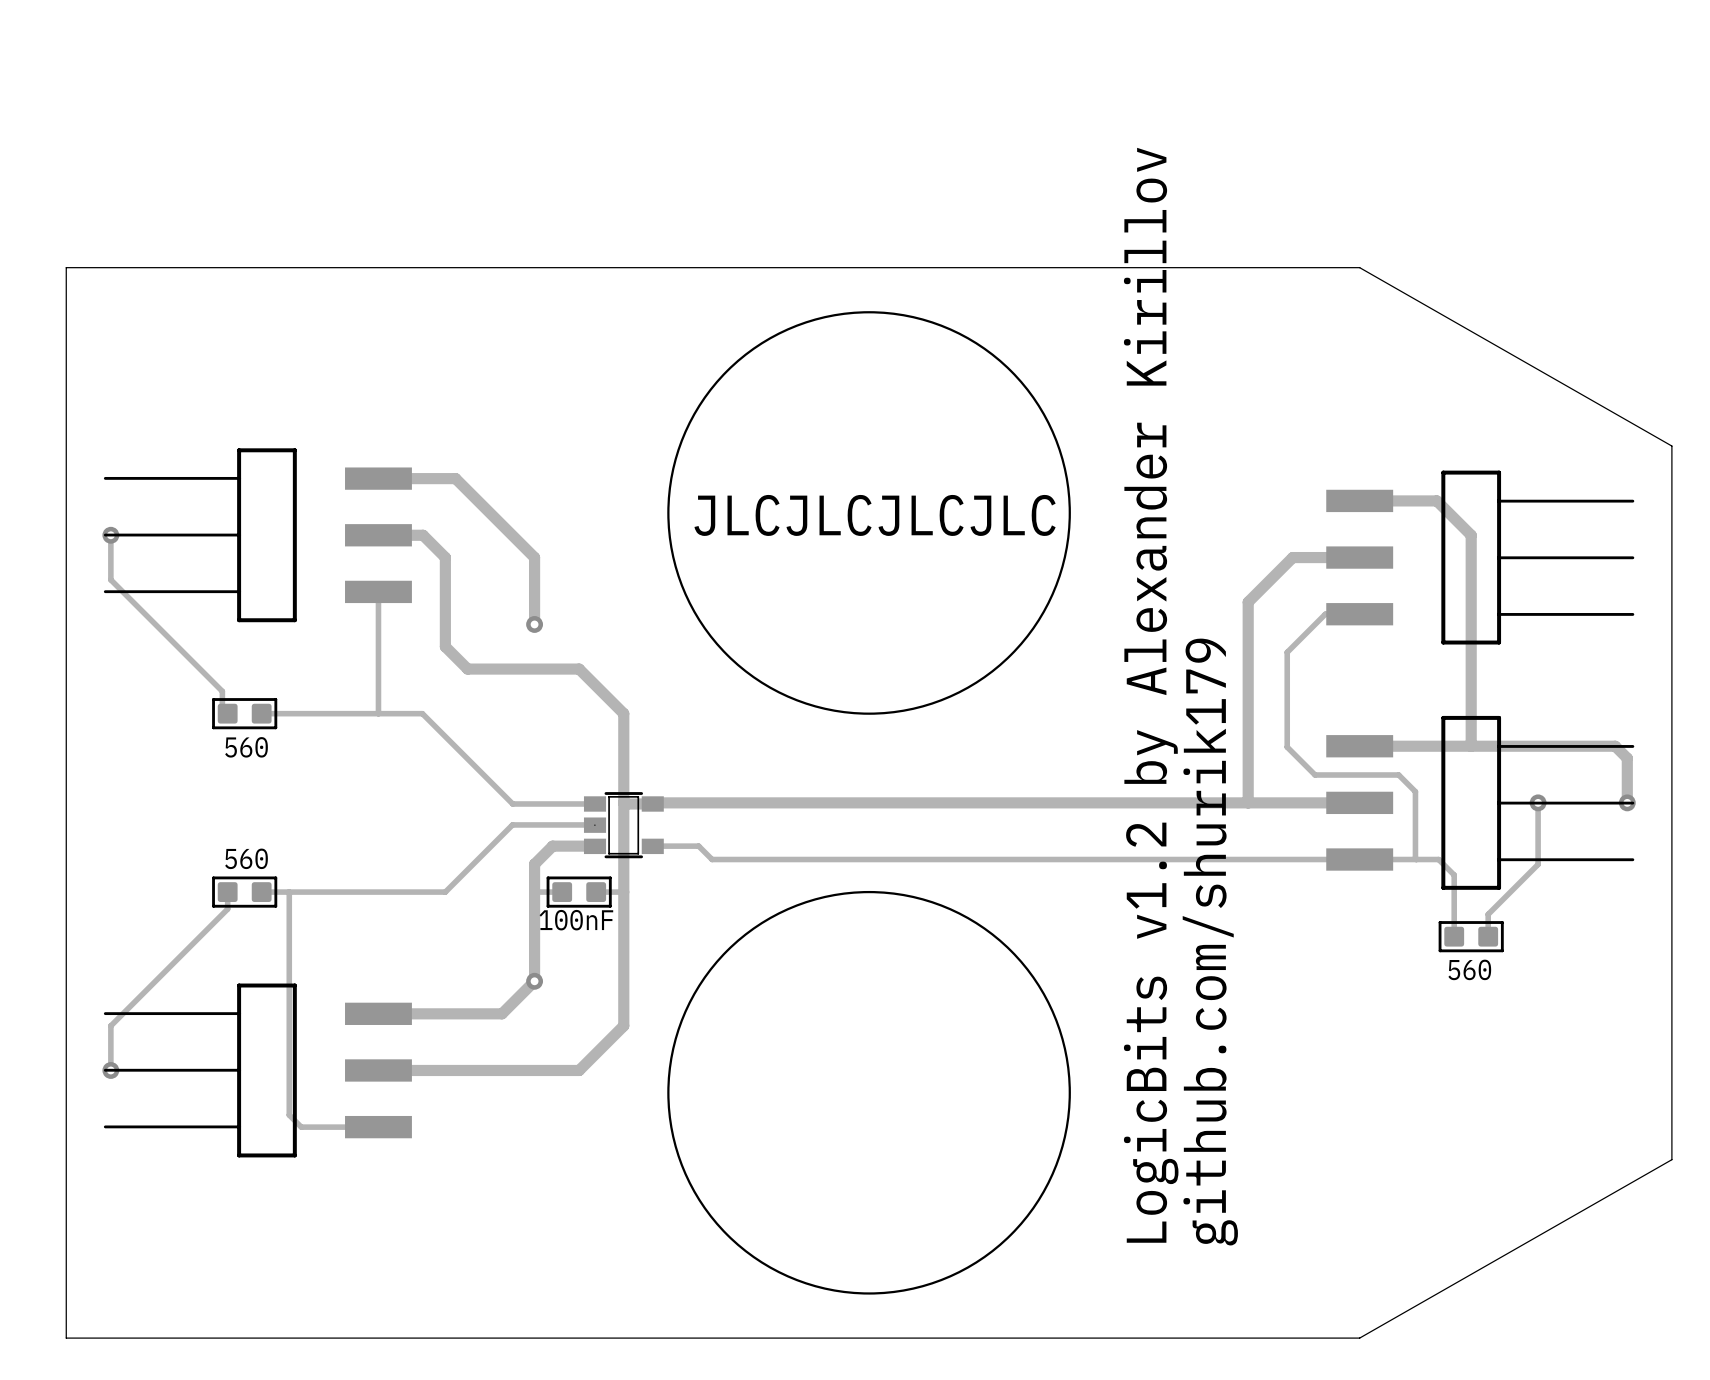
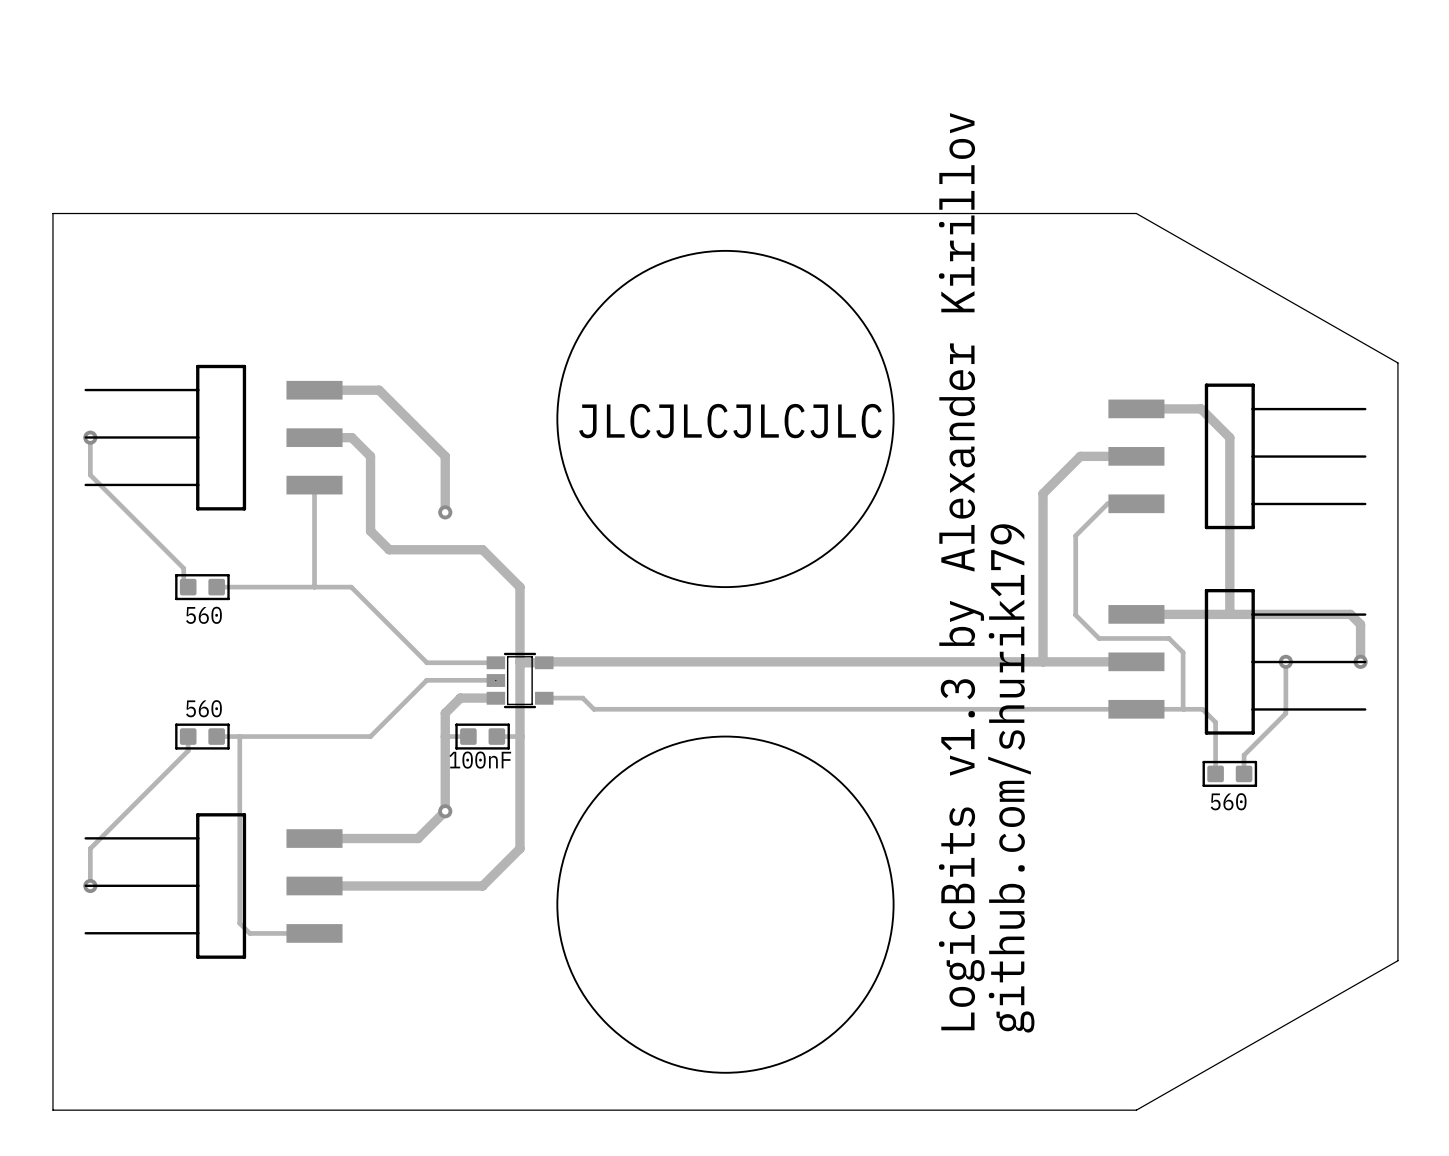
text: LogicBits v1.2 by Alexander Kirillov (1151, 695) -> LogicBits v1.3 by Alexander Kirillov (961, 571)

